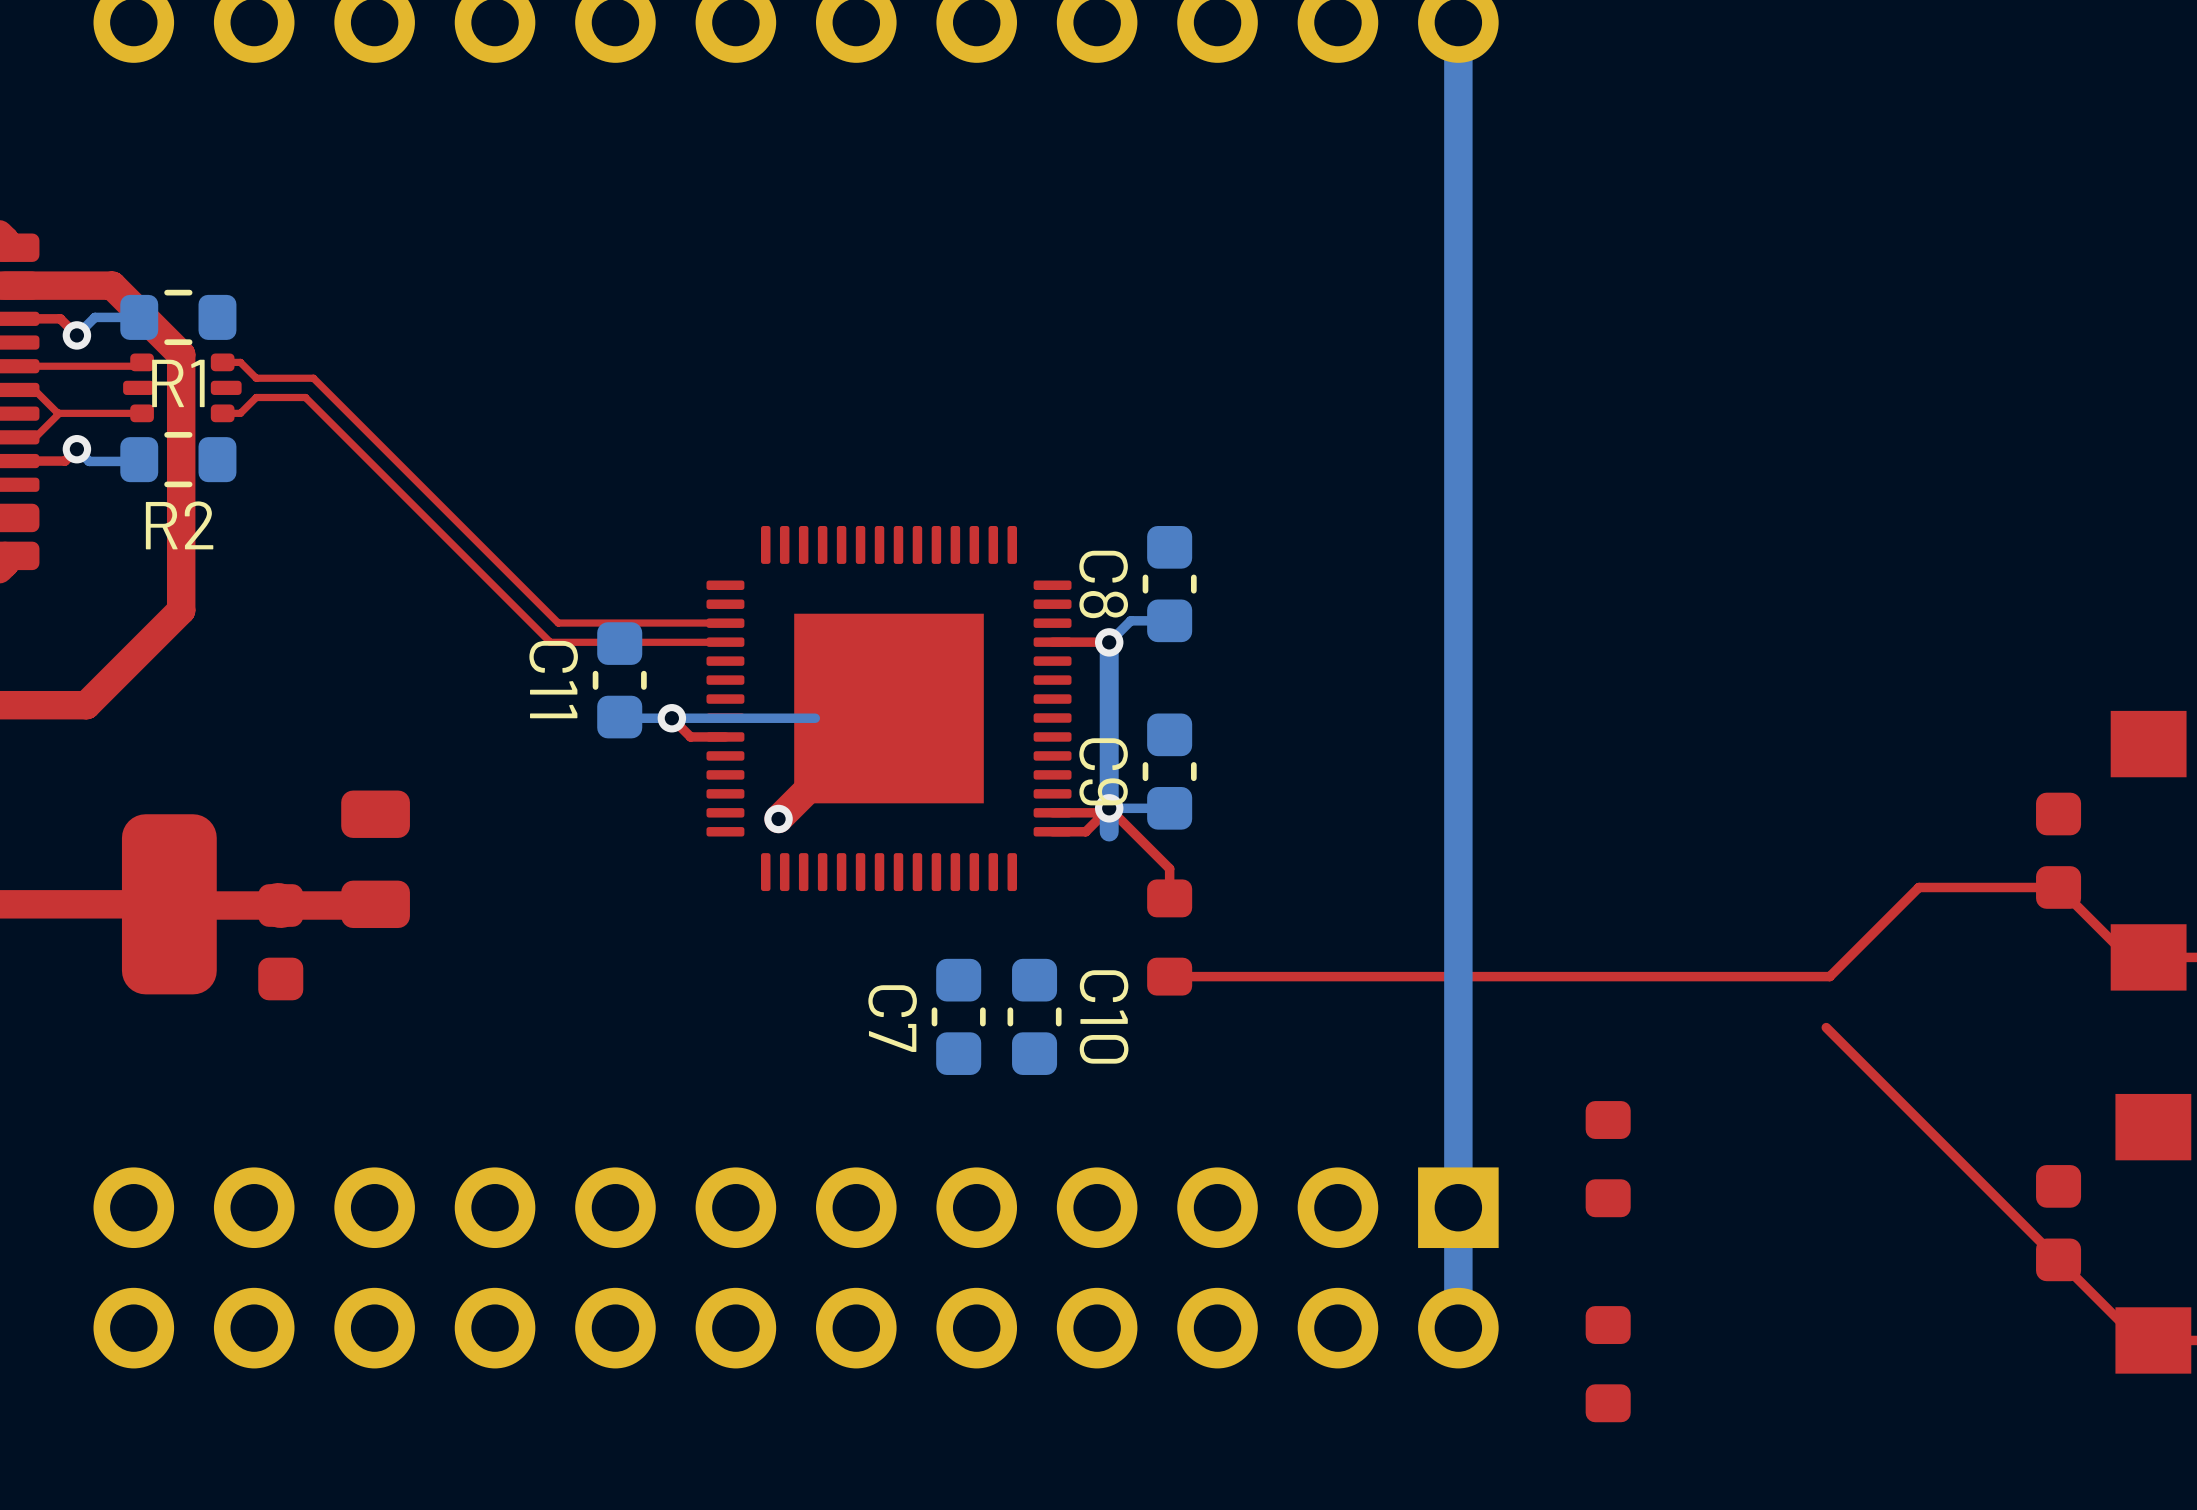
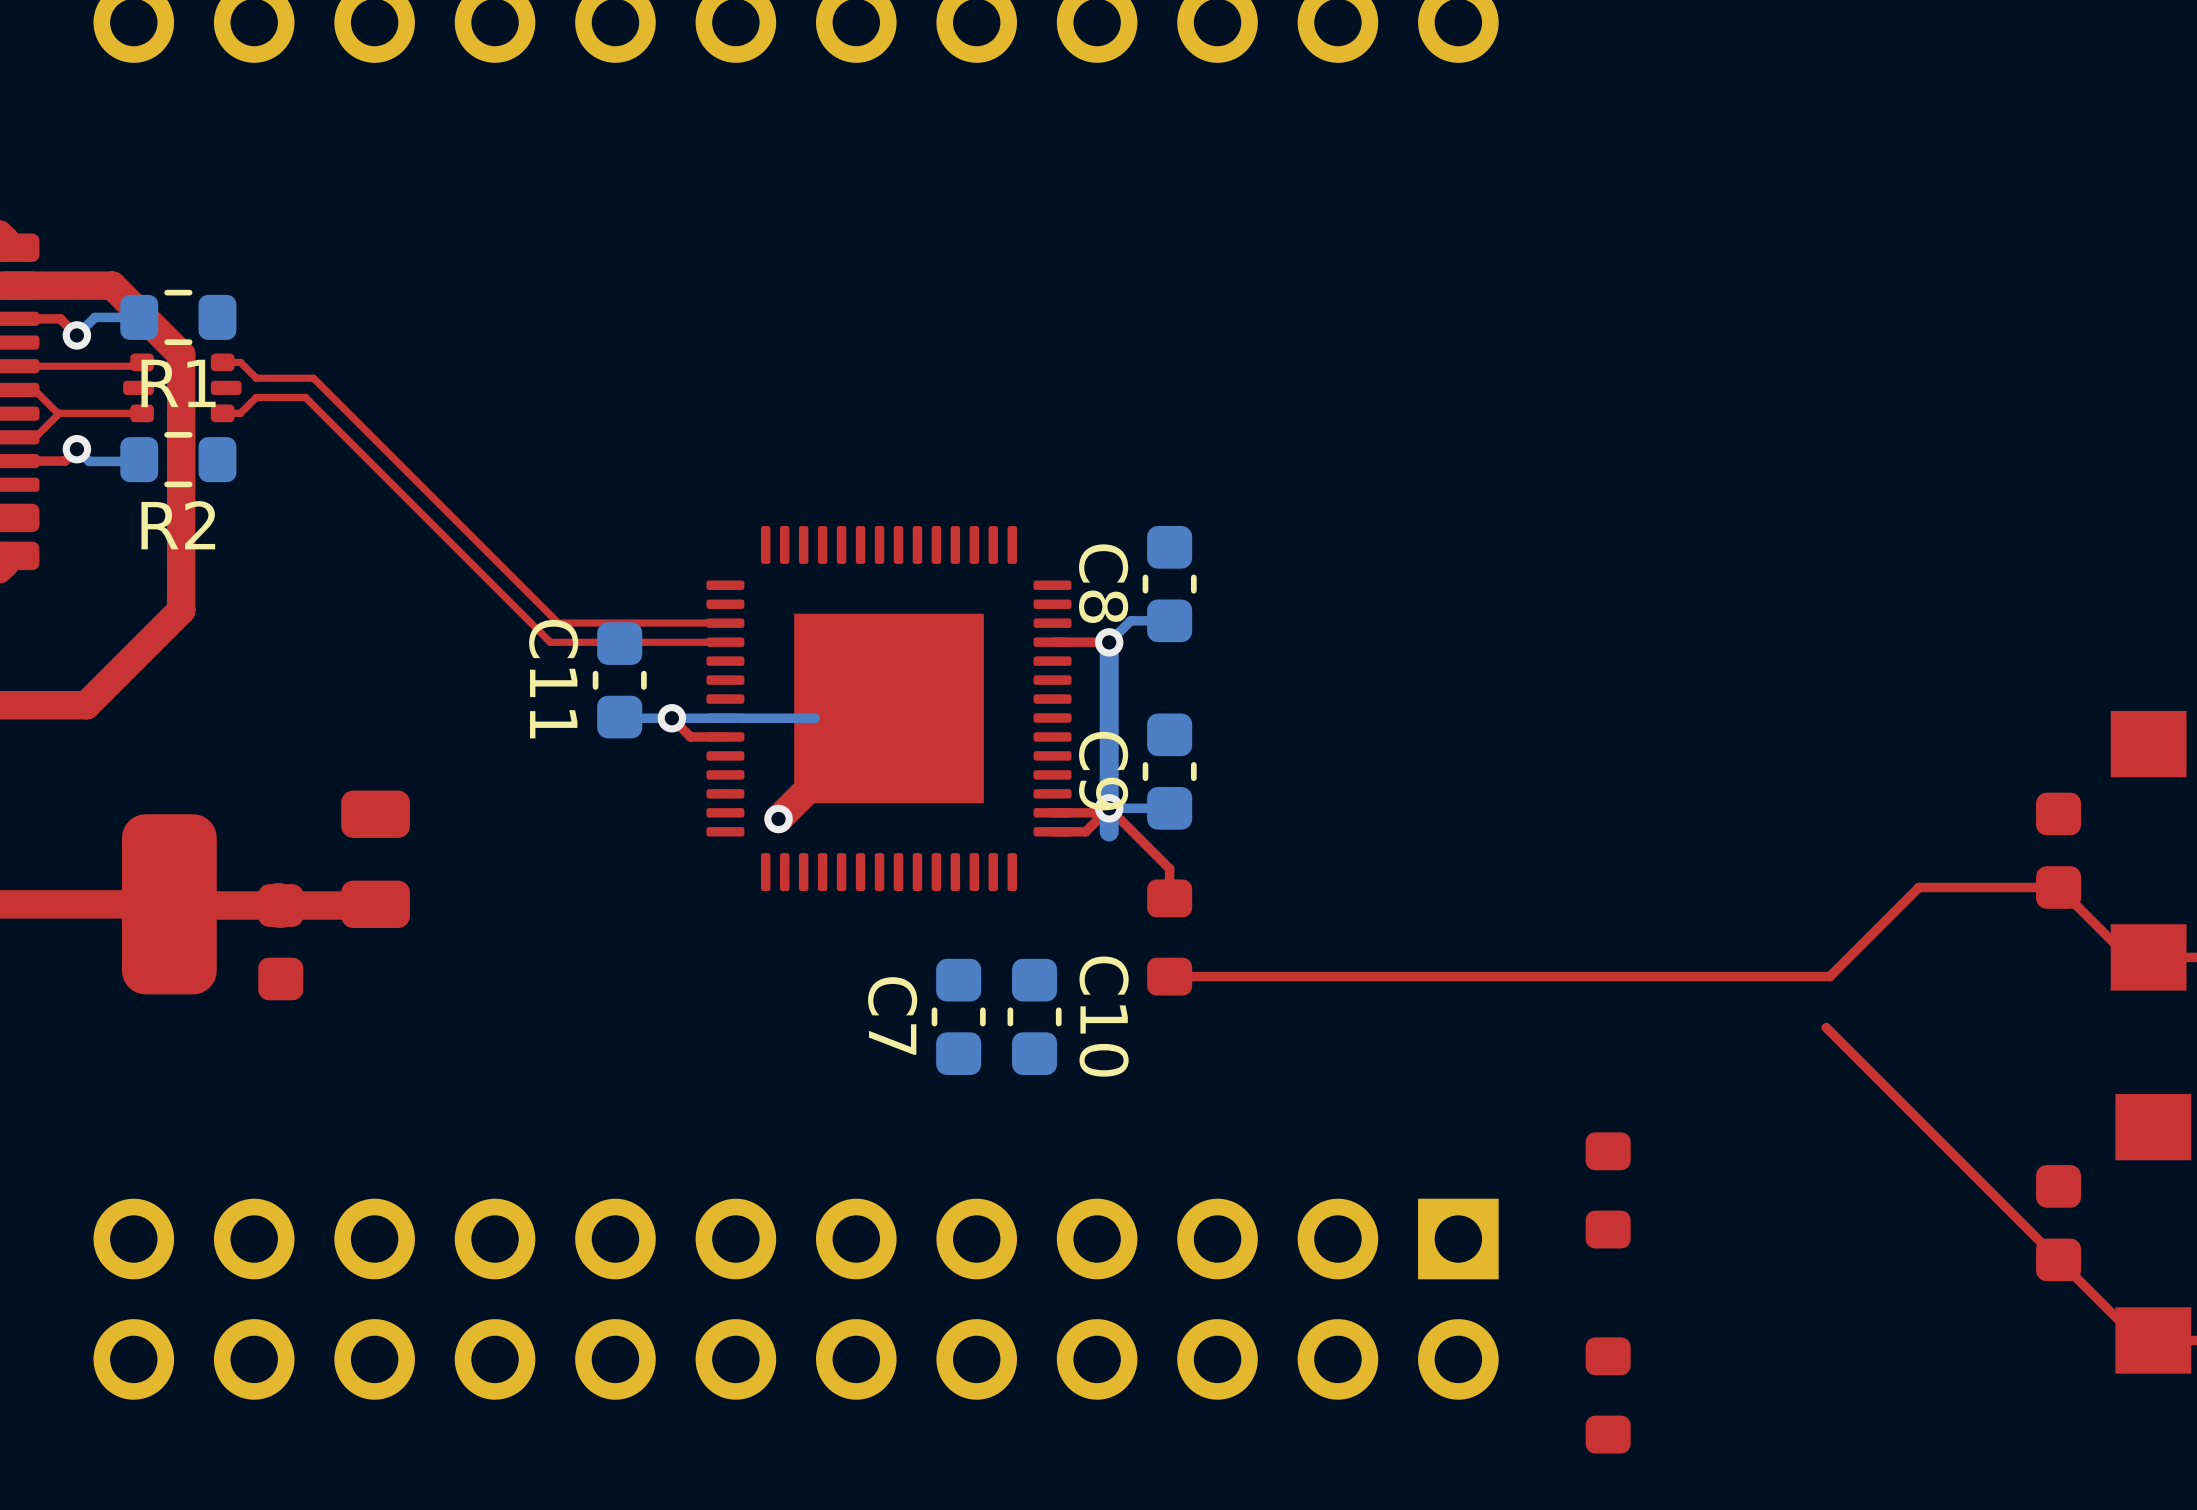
bottom track: (1458, 22) (1458, 1328) -> none
part position: (1608, 1159) -> (1608, 1190)
part position: (796, 1267) -> (796, 1299)
part position: (1608, 1364) -> (1608, 1395)

